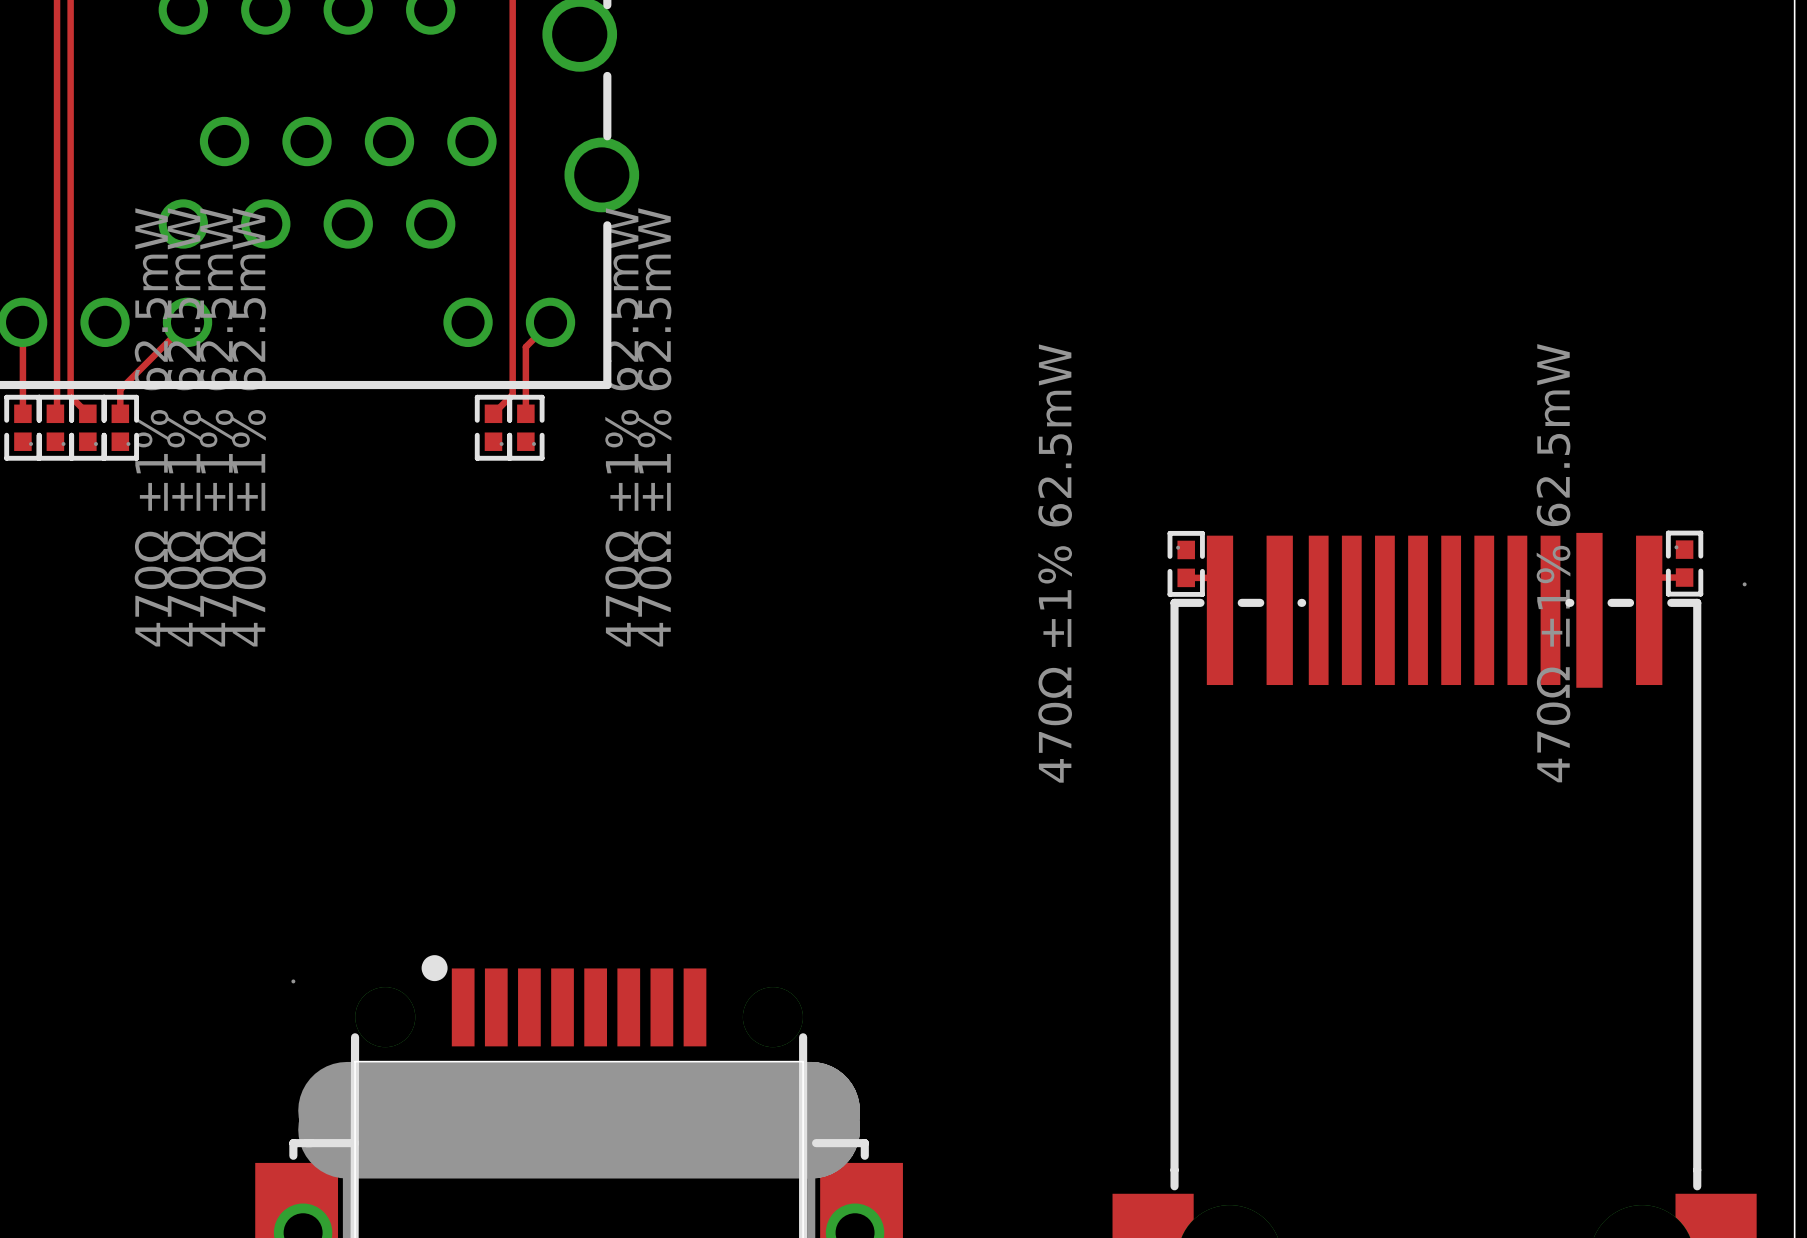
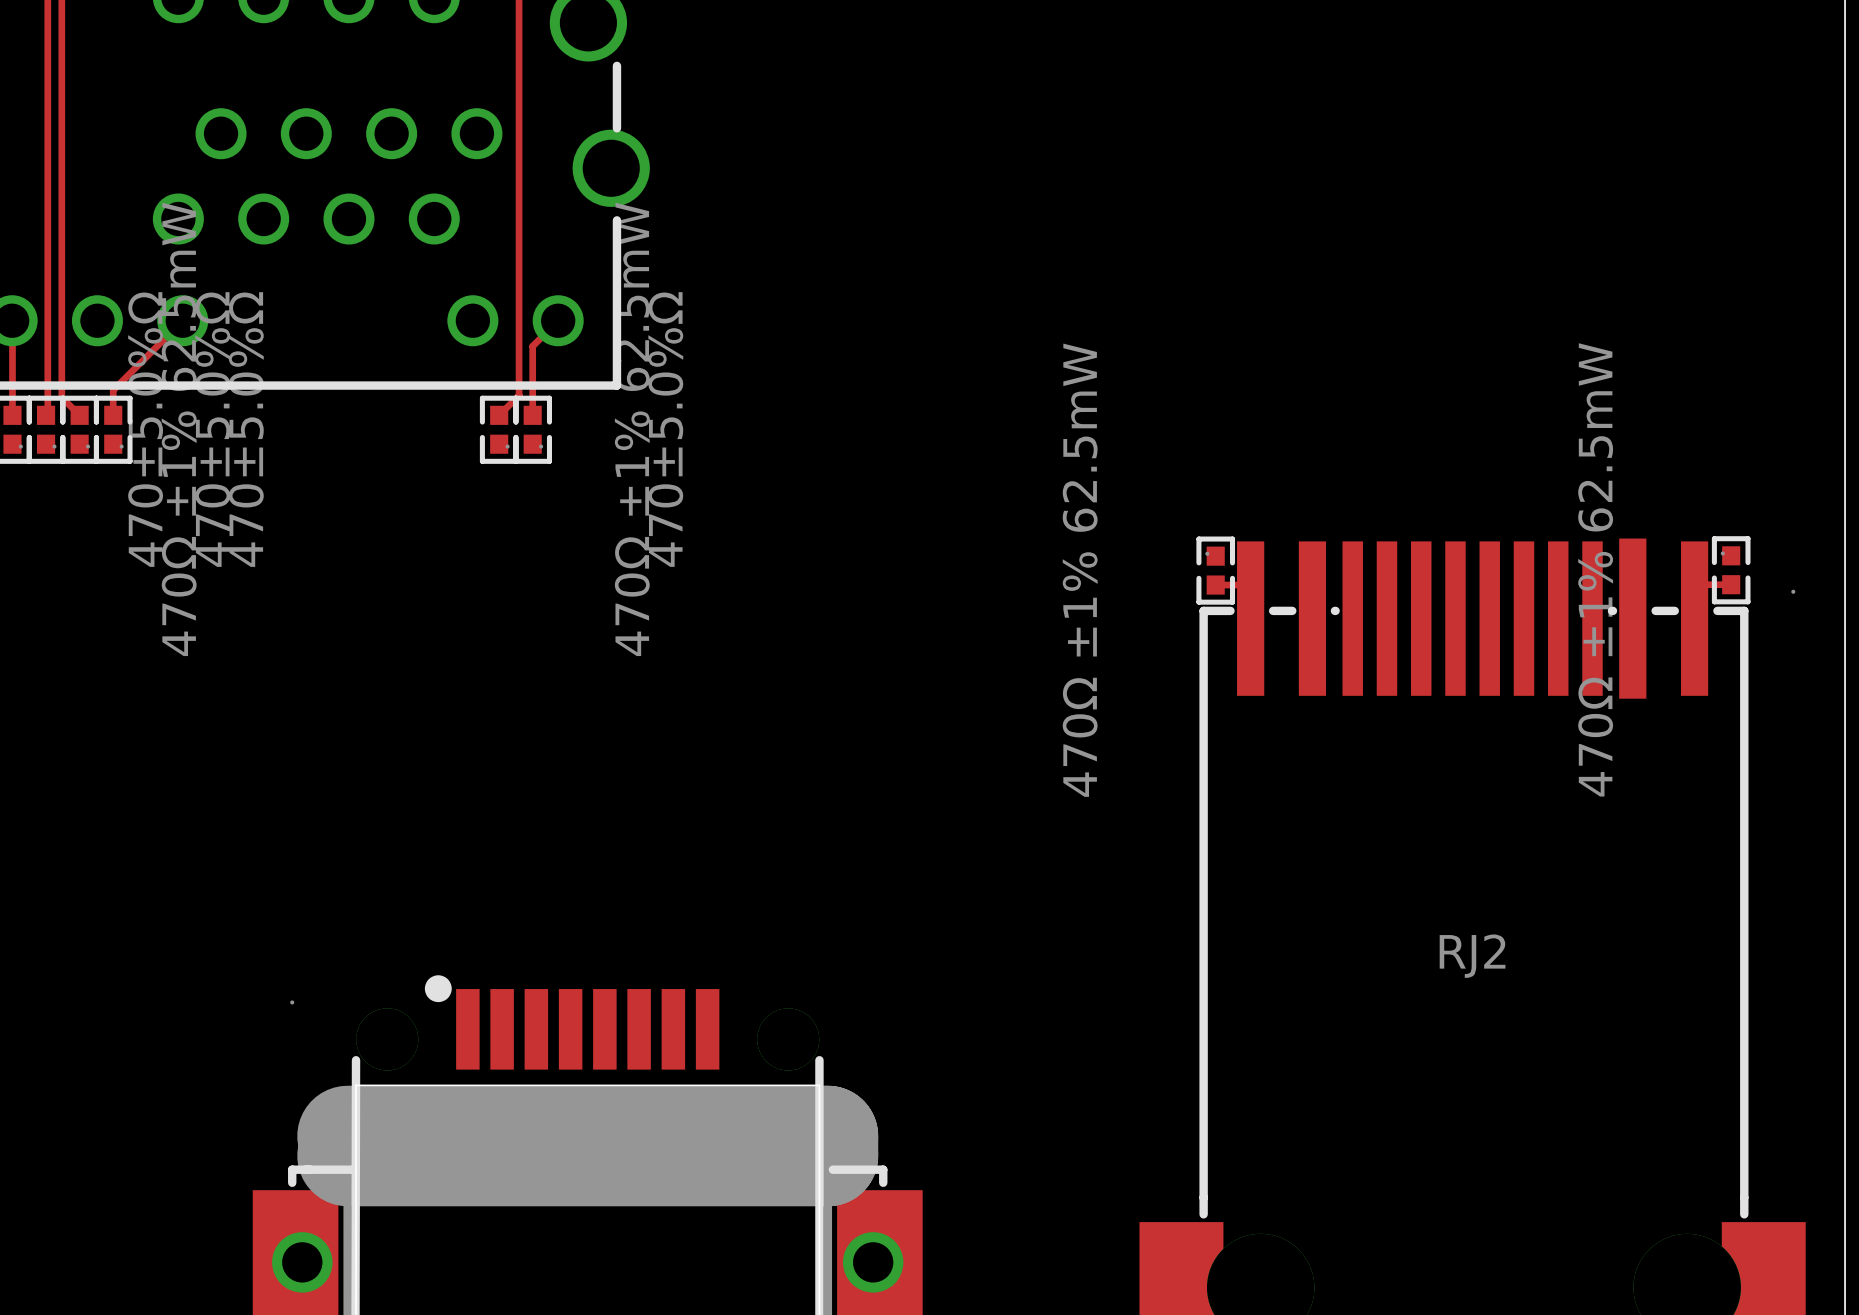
part value: 470Ω ±1% 62.5mW (151, 427) -> 470±5.0%Ω (145, 429)
part value: 470Ω ±1% 62.5mW (216, 427) -> 470±5.0%Ω (212, 429)
part value: 470Ω ±1% 62.5mW (249, 427) -> 470±5.0%Ω (246, 429)
part value: 470Ω ±1% 62.5mW (654, 427) -> 470±5.0%Ω (665, 429)
RJ2 name: none -> RJ2 (1472, 956)

